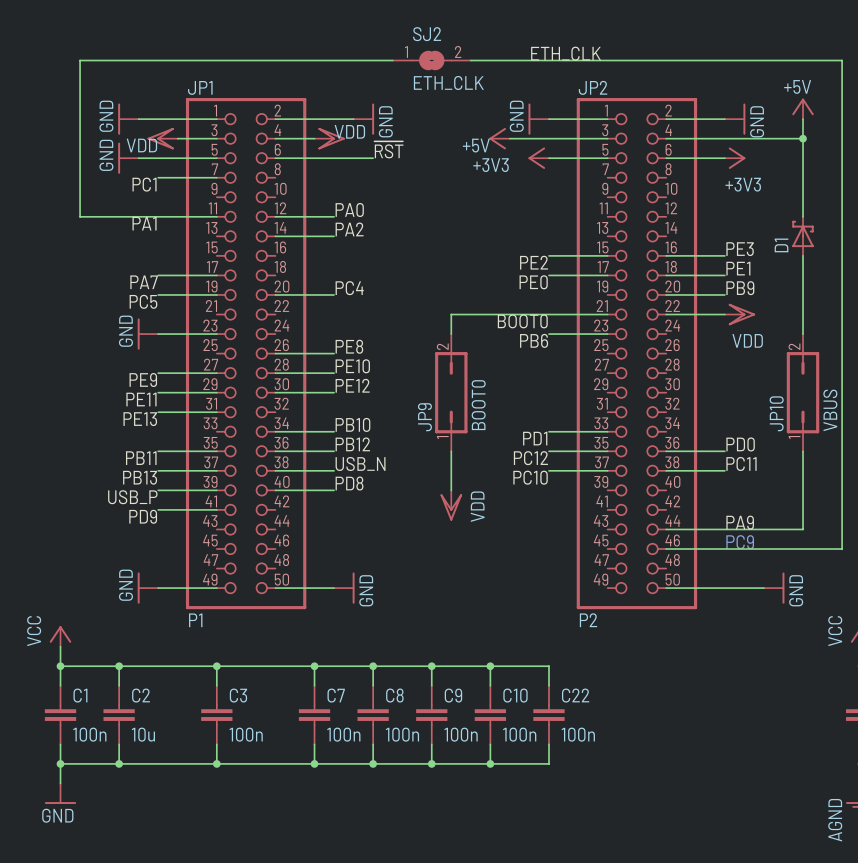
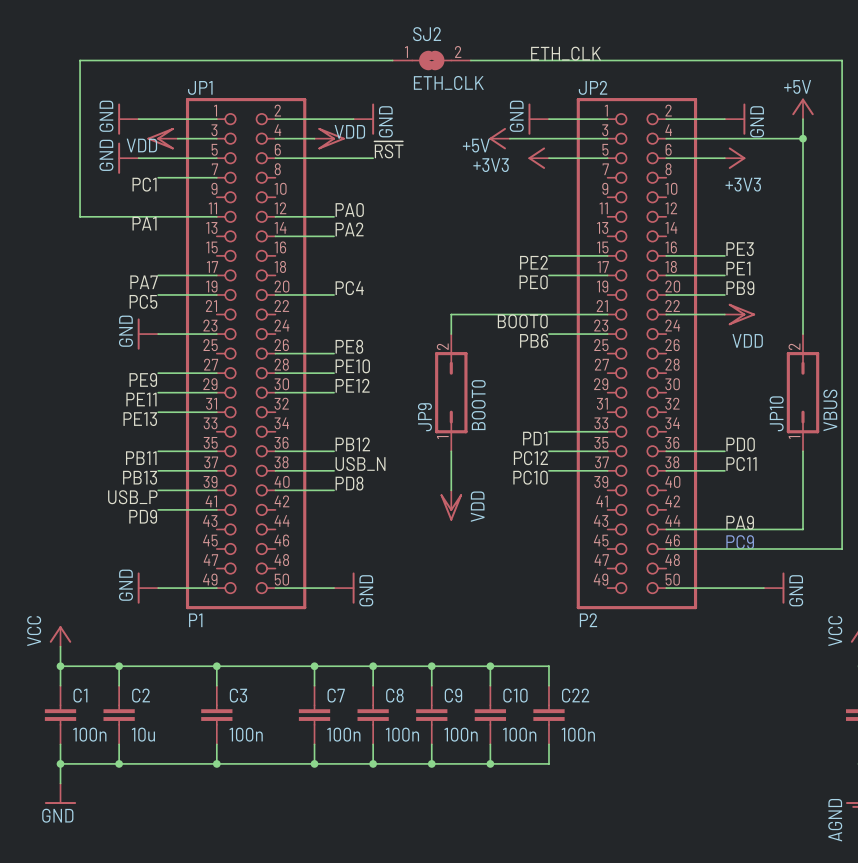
D1: (803, 236) -> none
label: PB10 (352, 424) -> none
wire: (275, 431) (334, 431) -> none

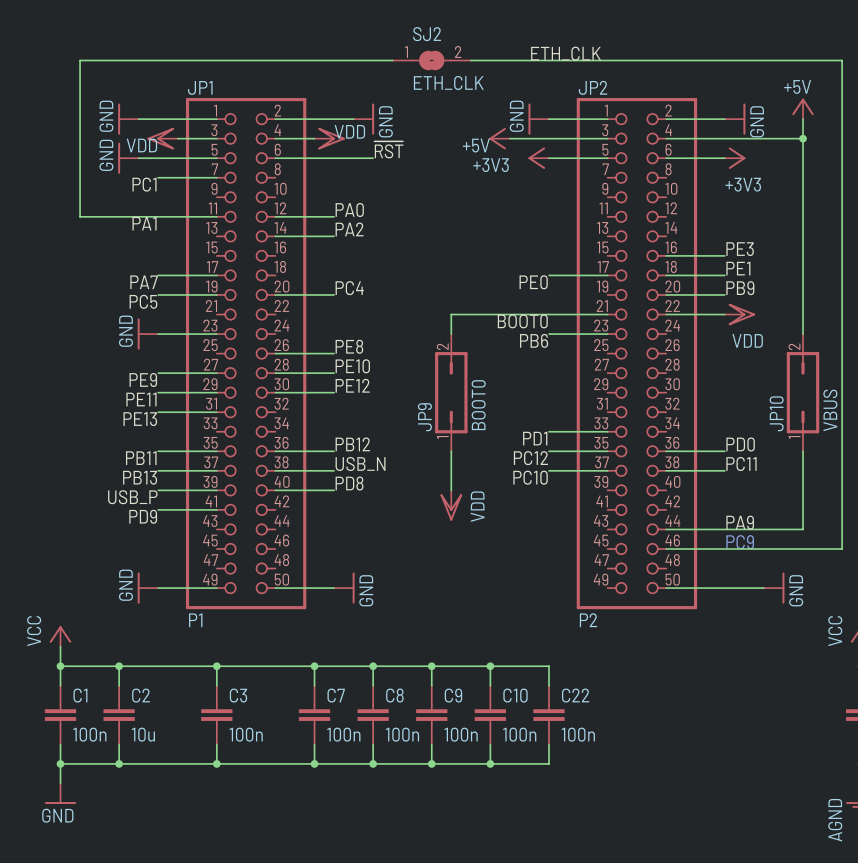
wire: (548, 255) (607, 255) -> none
label: PE2 (534, 262) -> none

